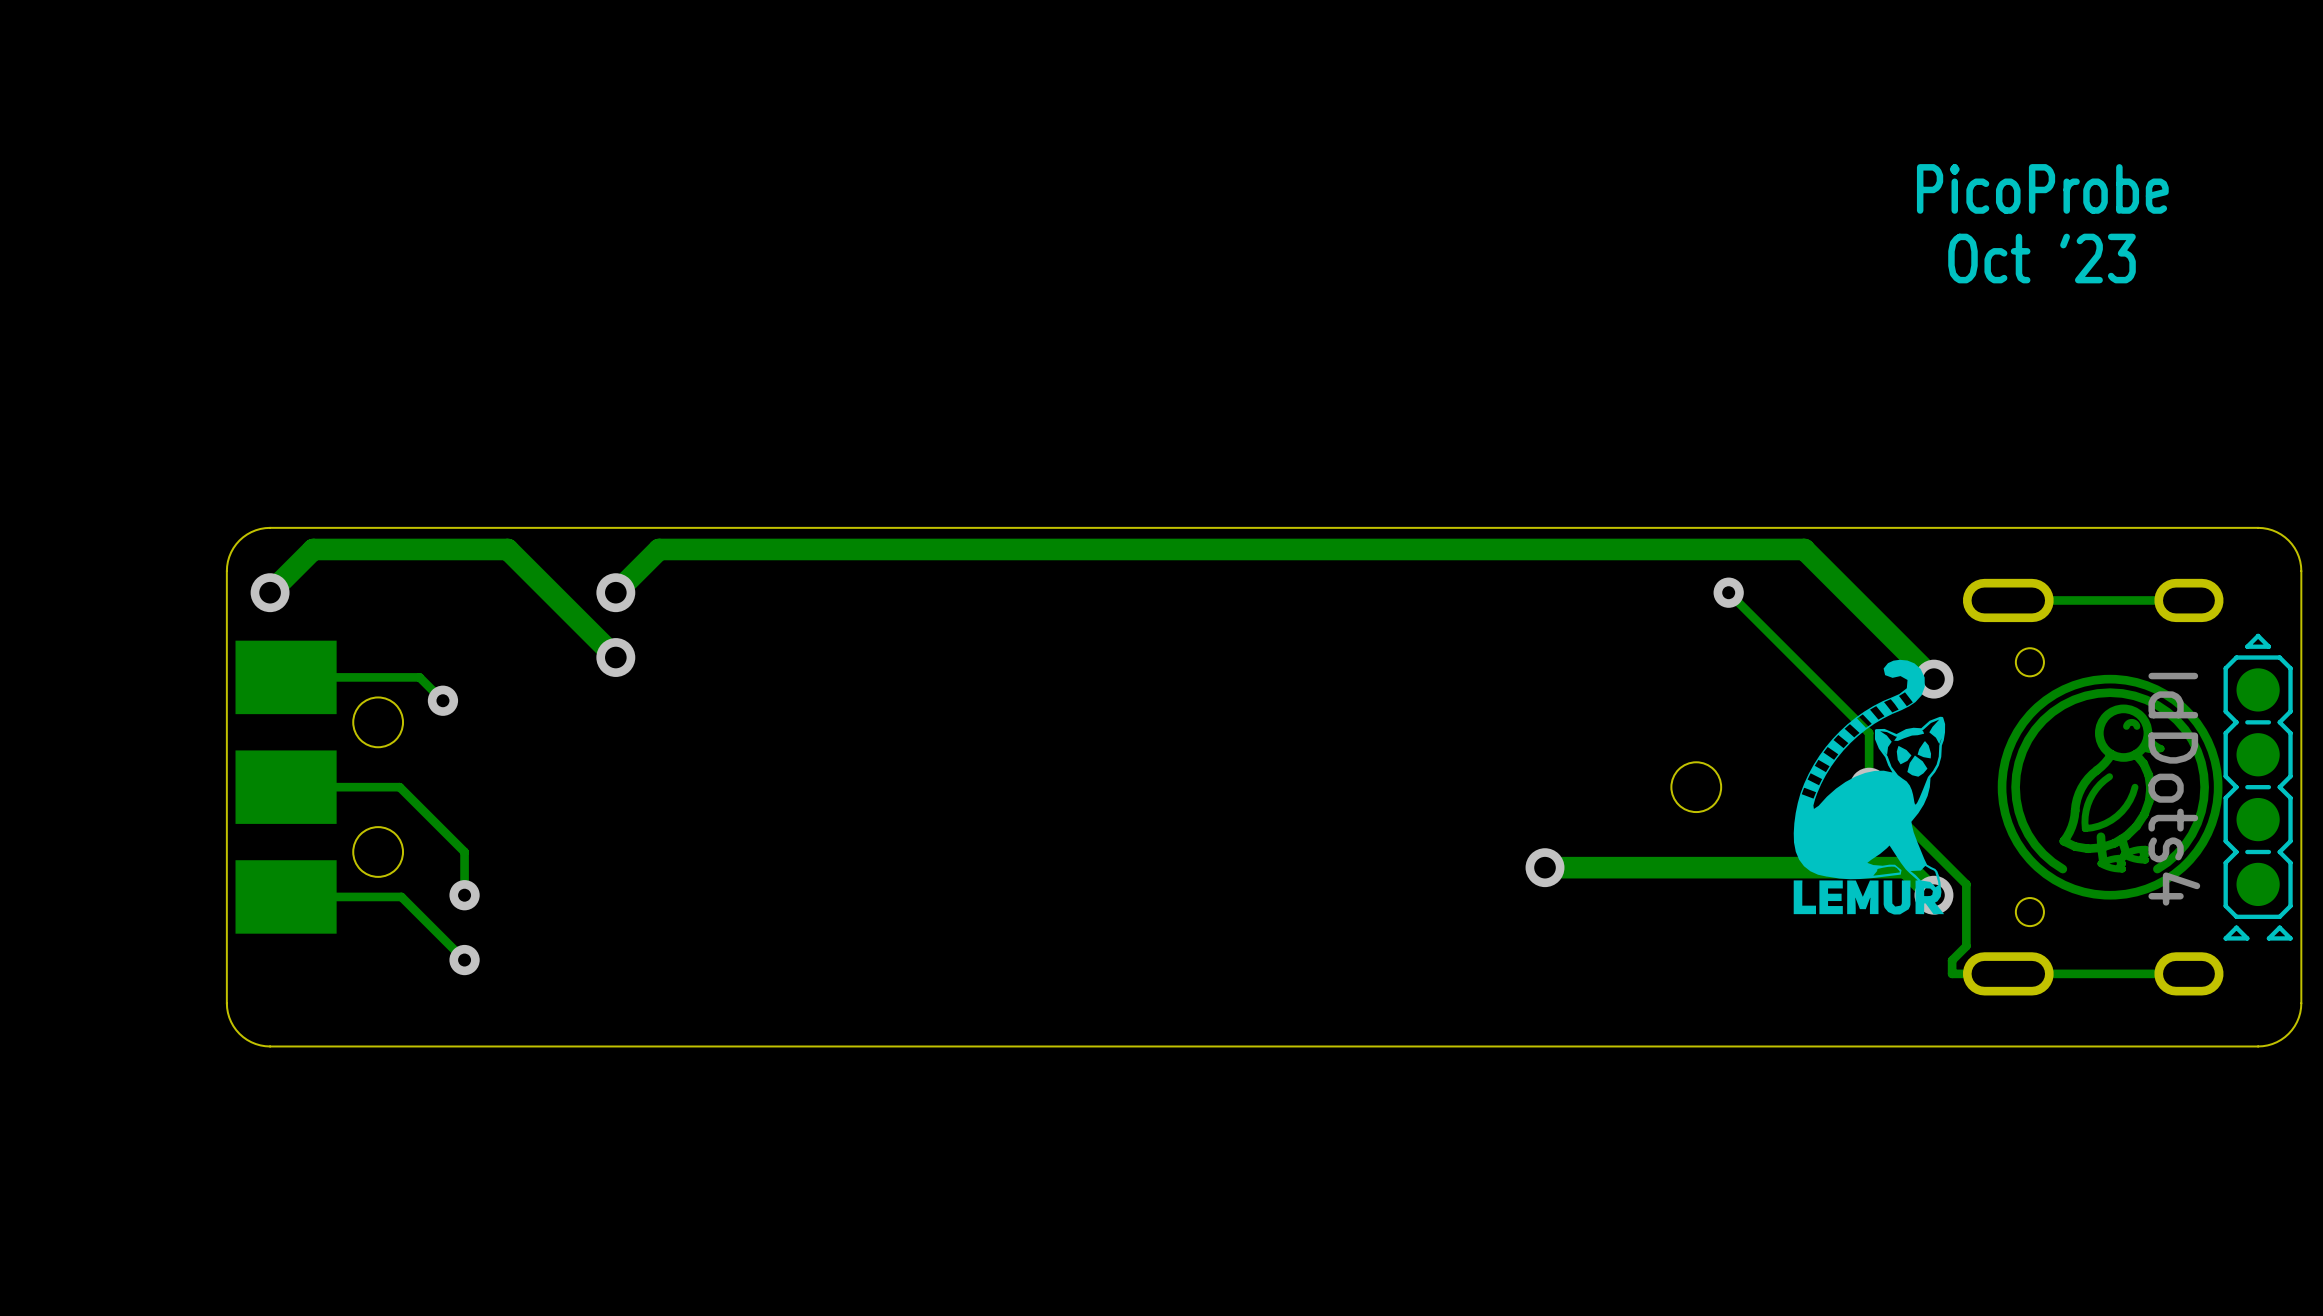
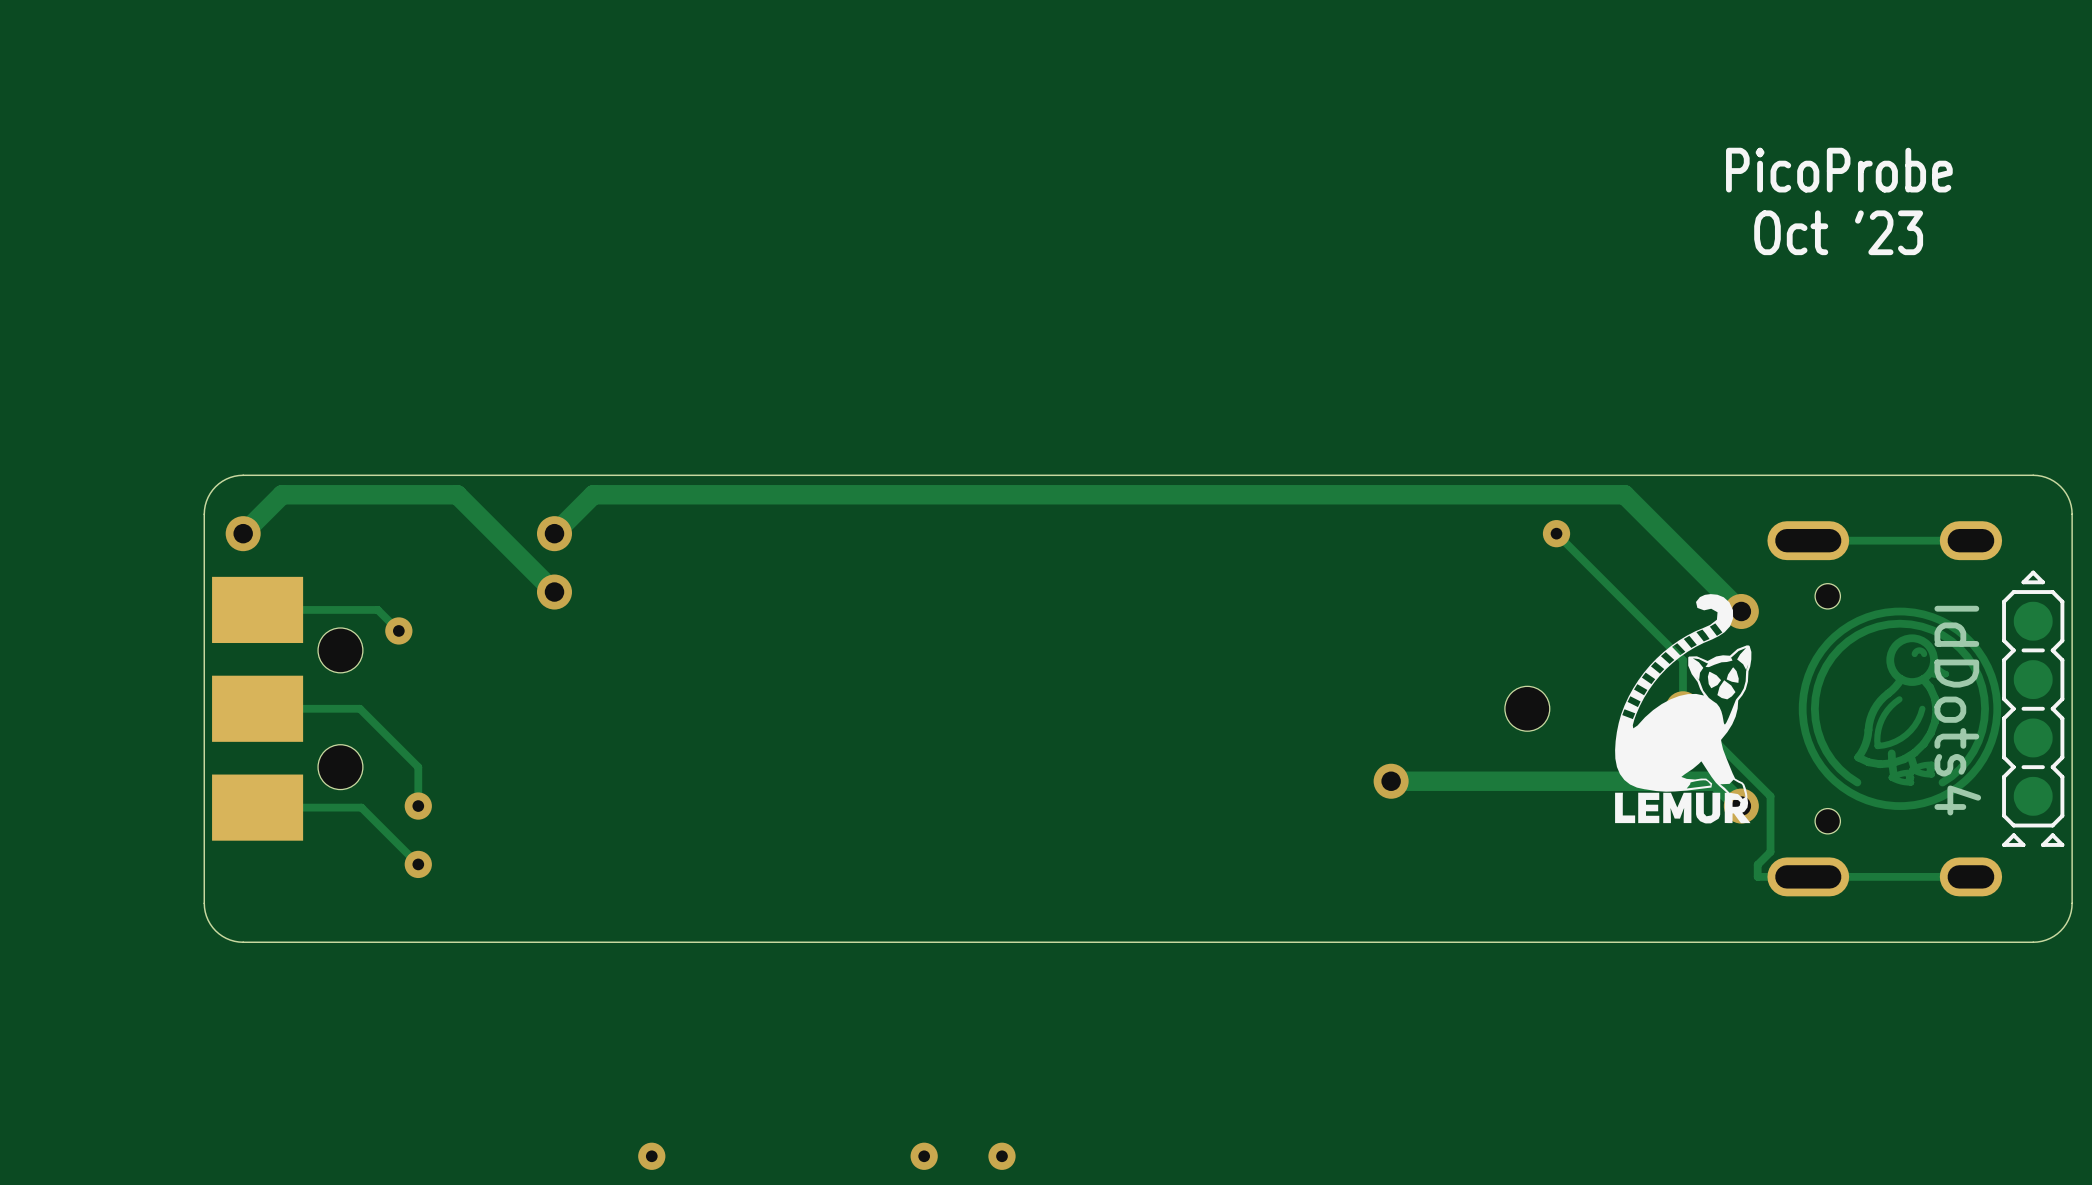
via: none -> (651, 1156)
via: none -> (924, 1156)
via: none -> (1002, 1156)

